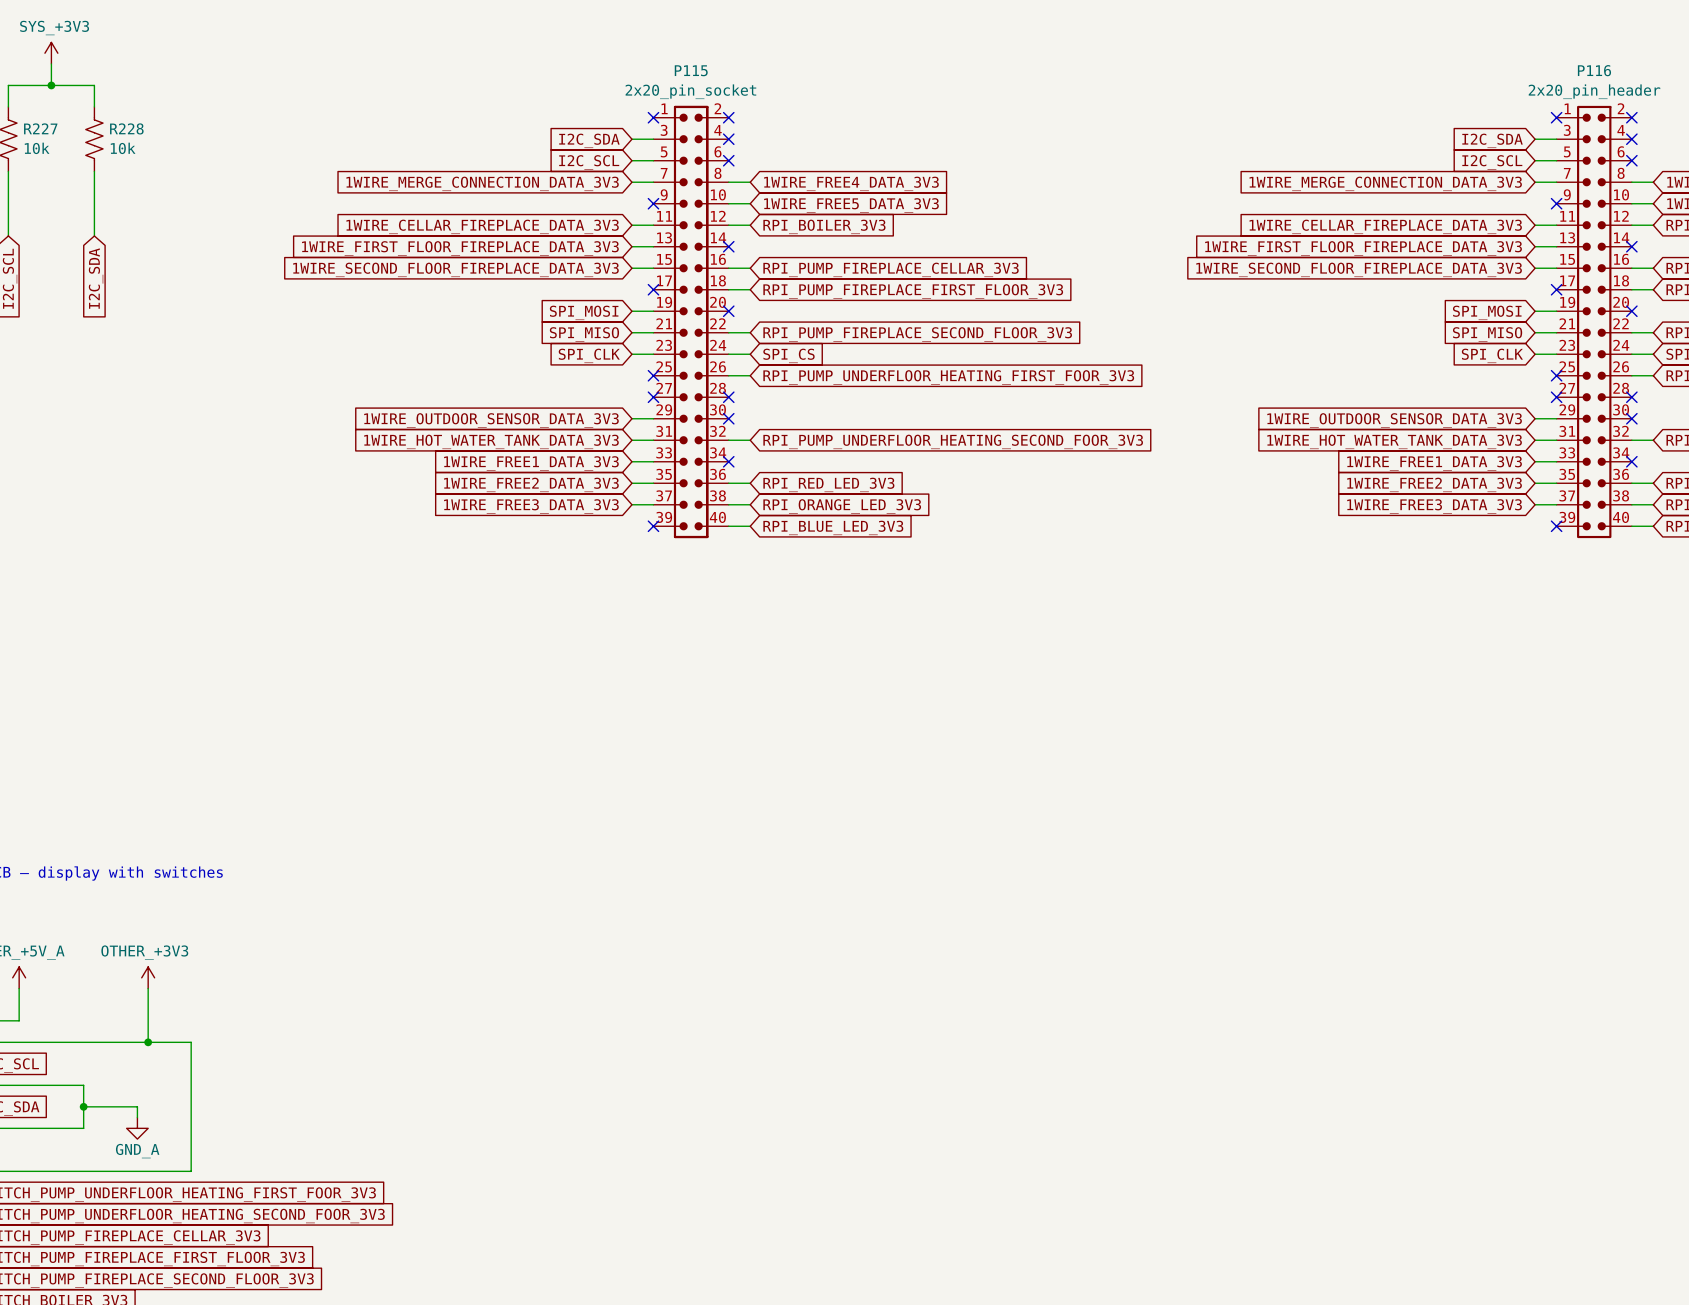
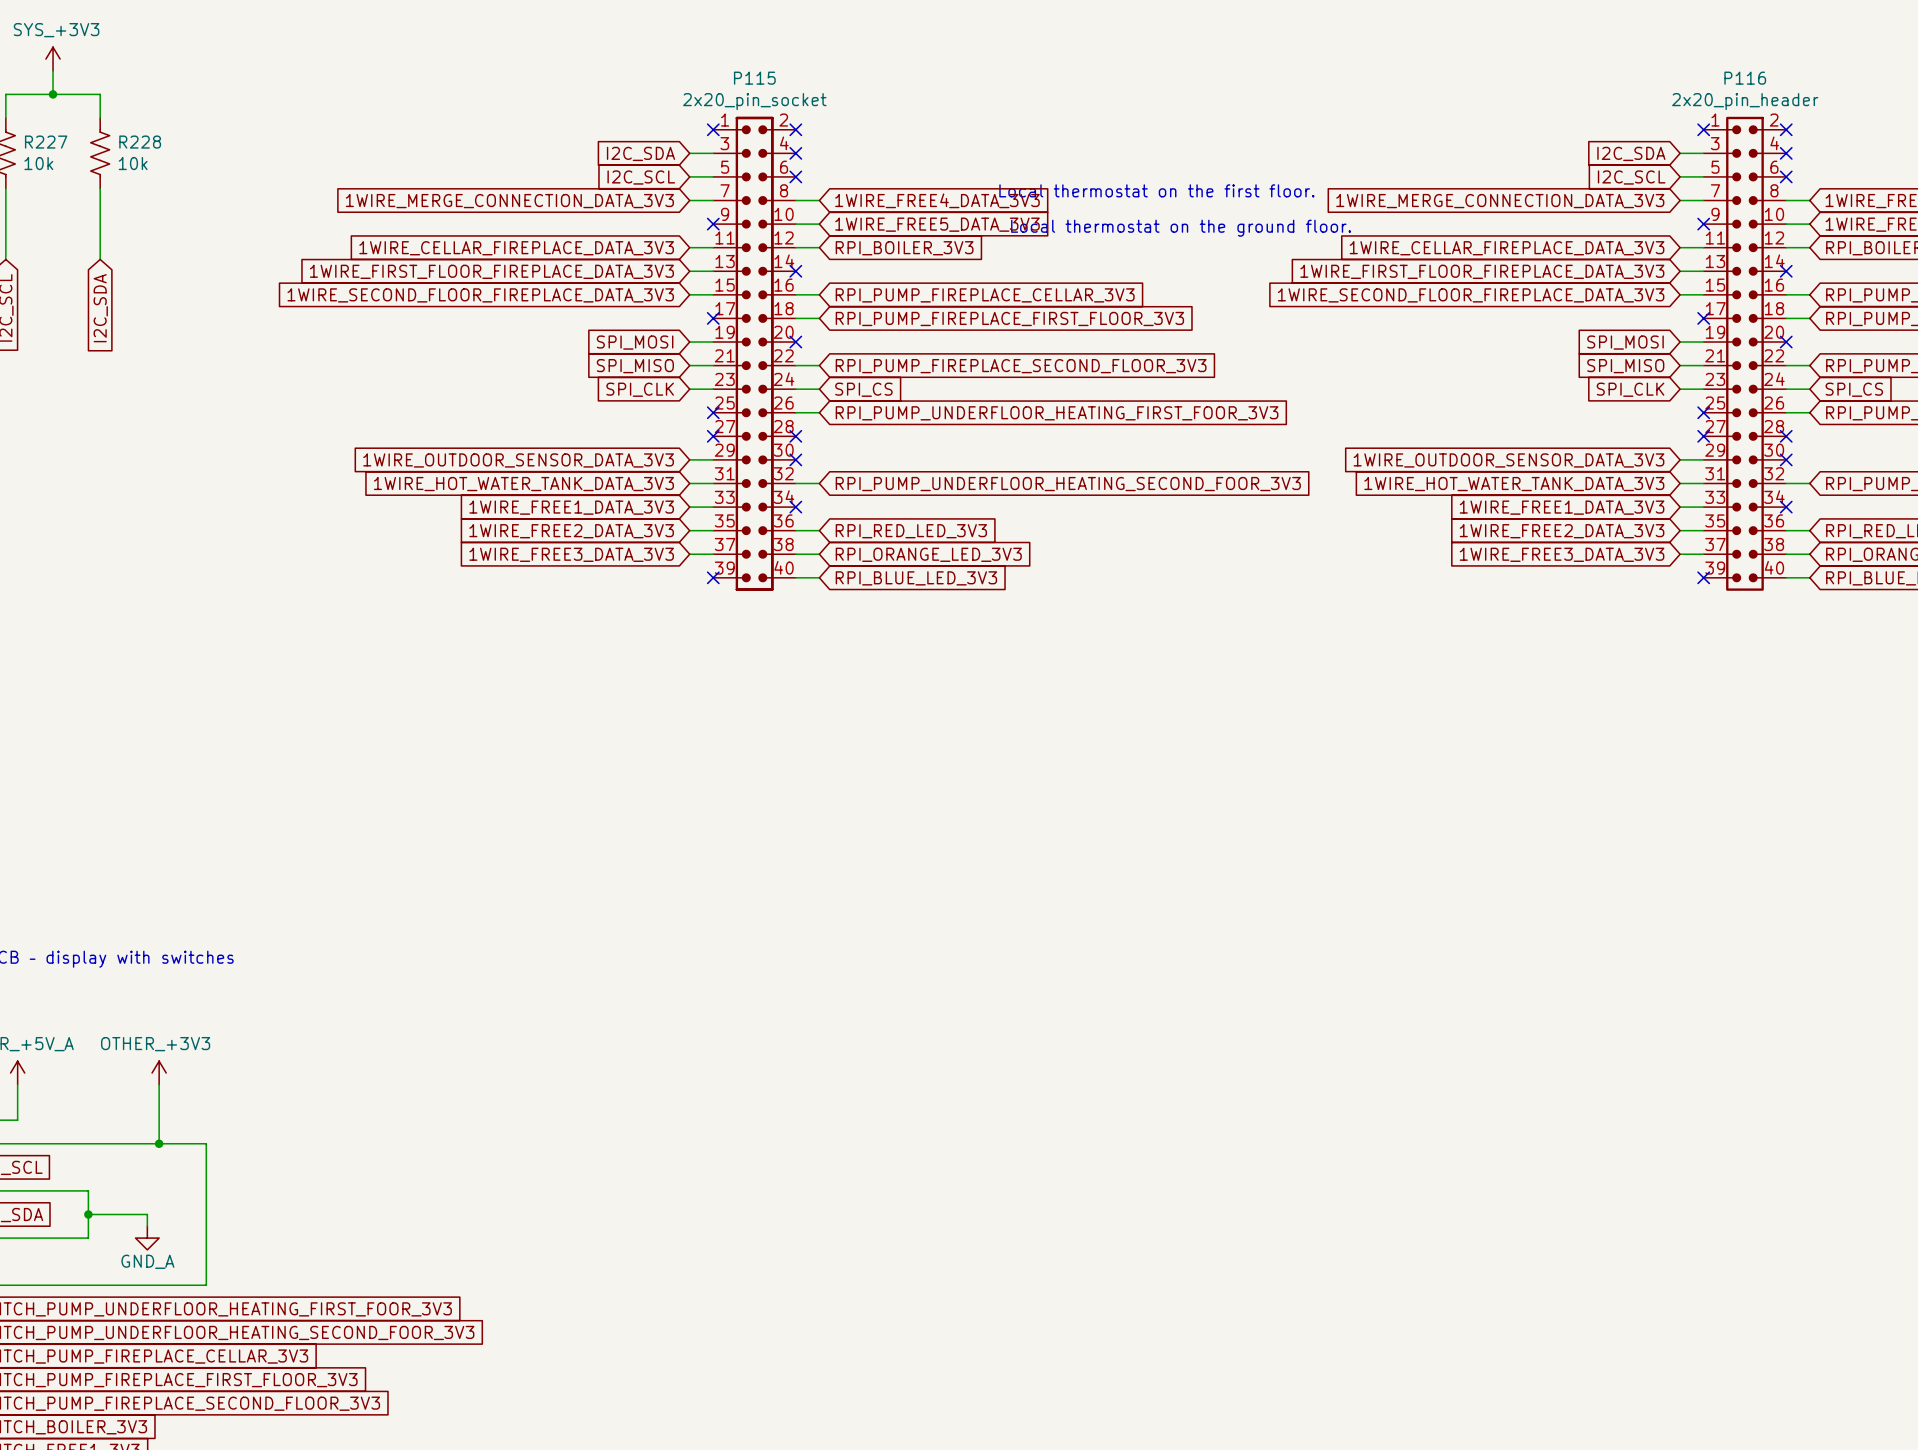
text: none -> Local thermostat on the first floor. (1156, 190)
text: none -> Local thermostat on the ground floor. (1181, 228)

